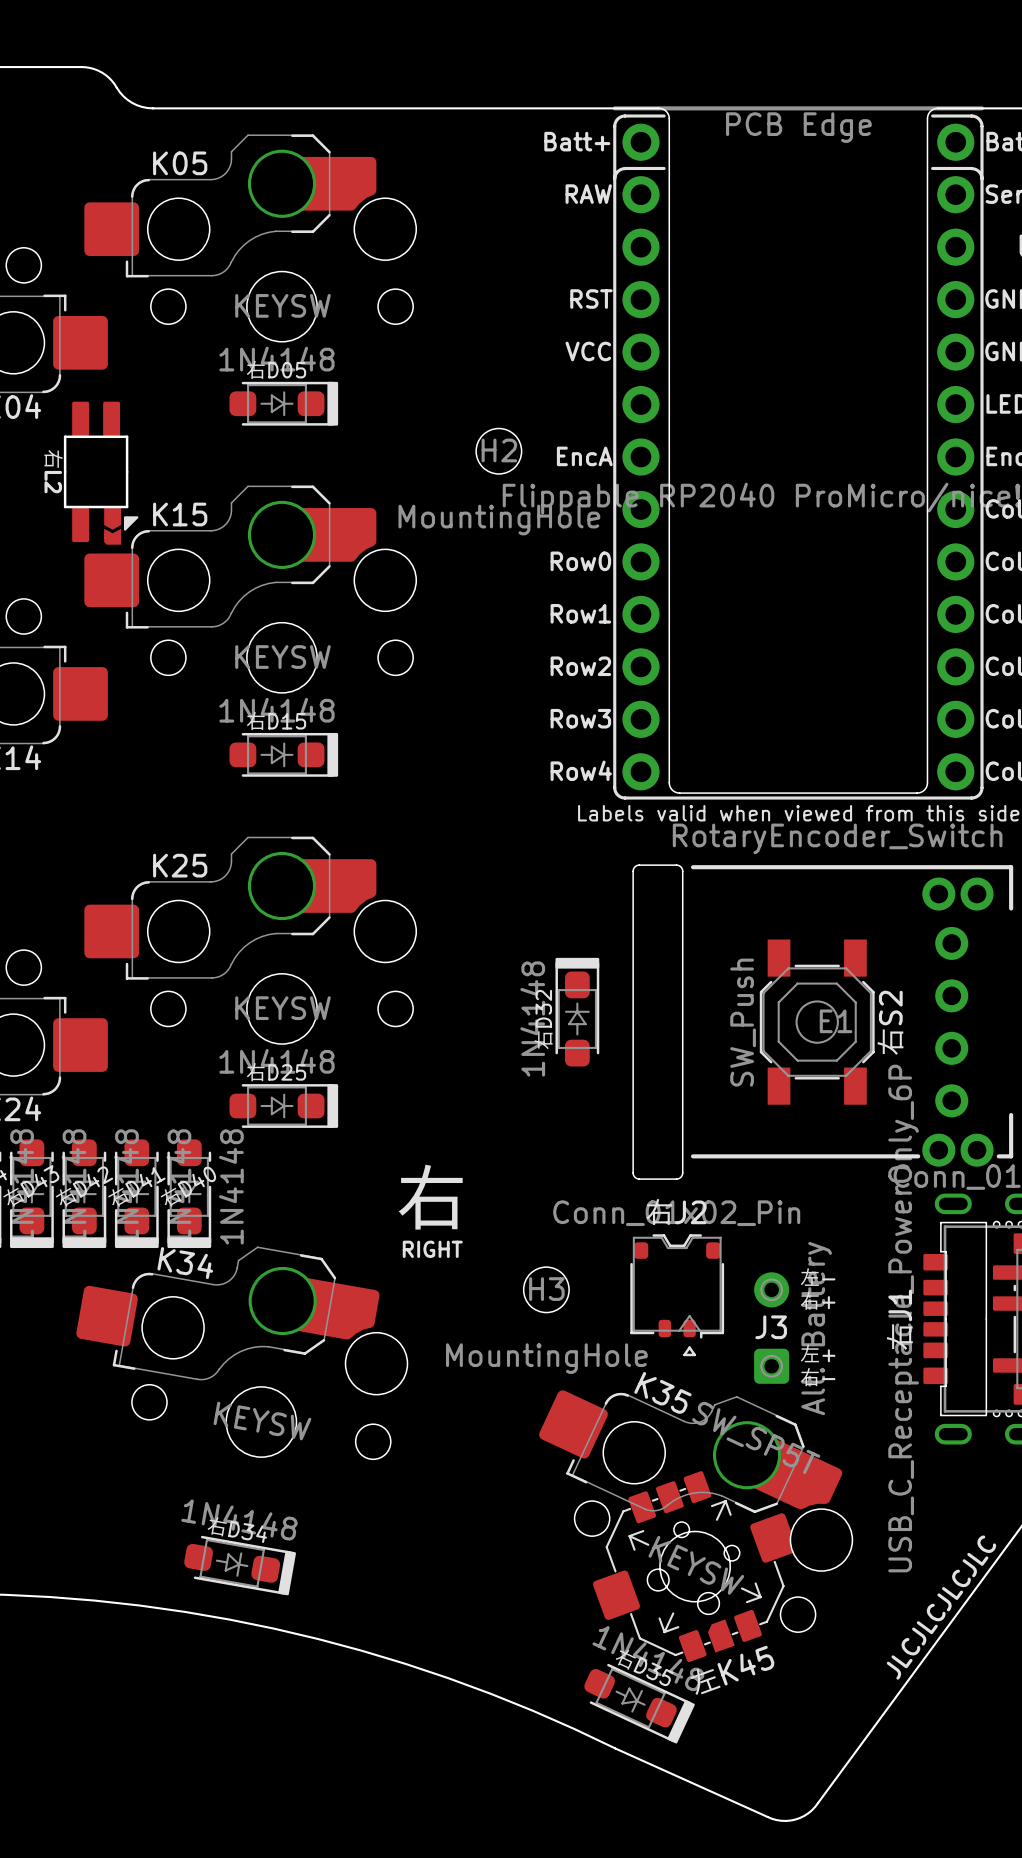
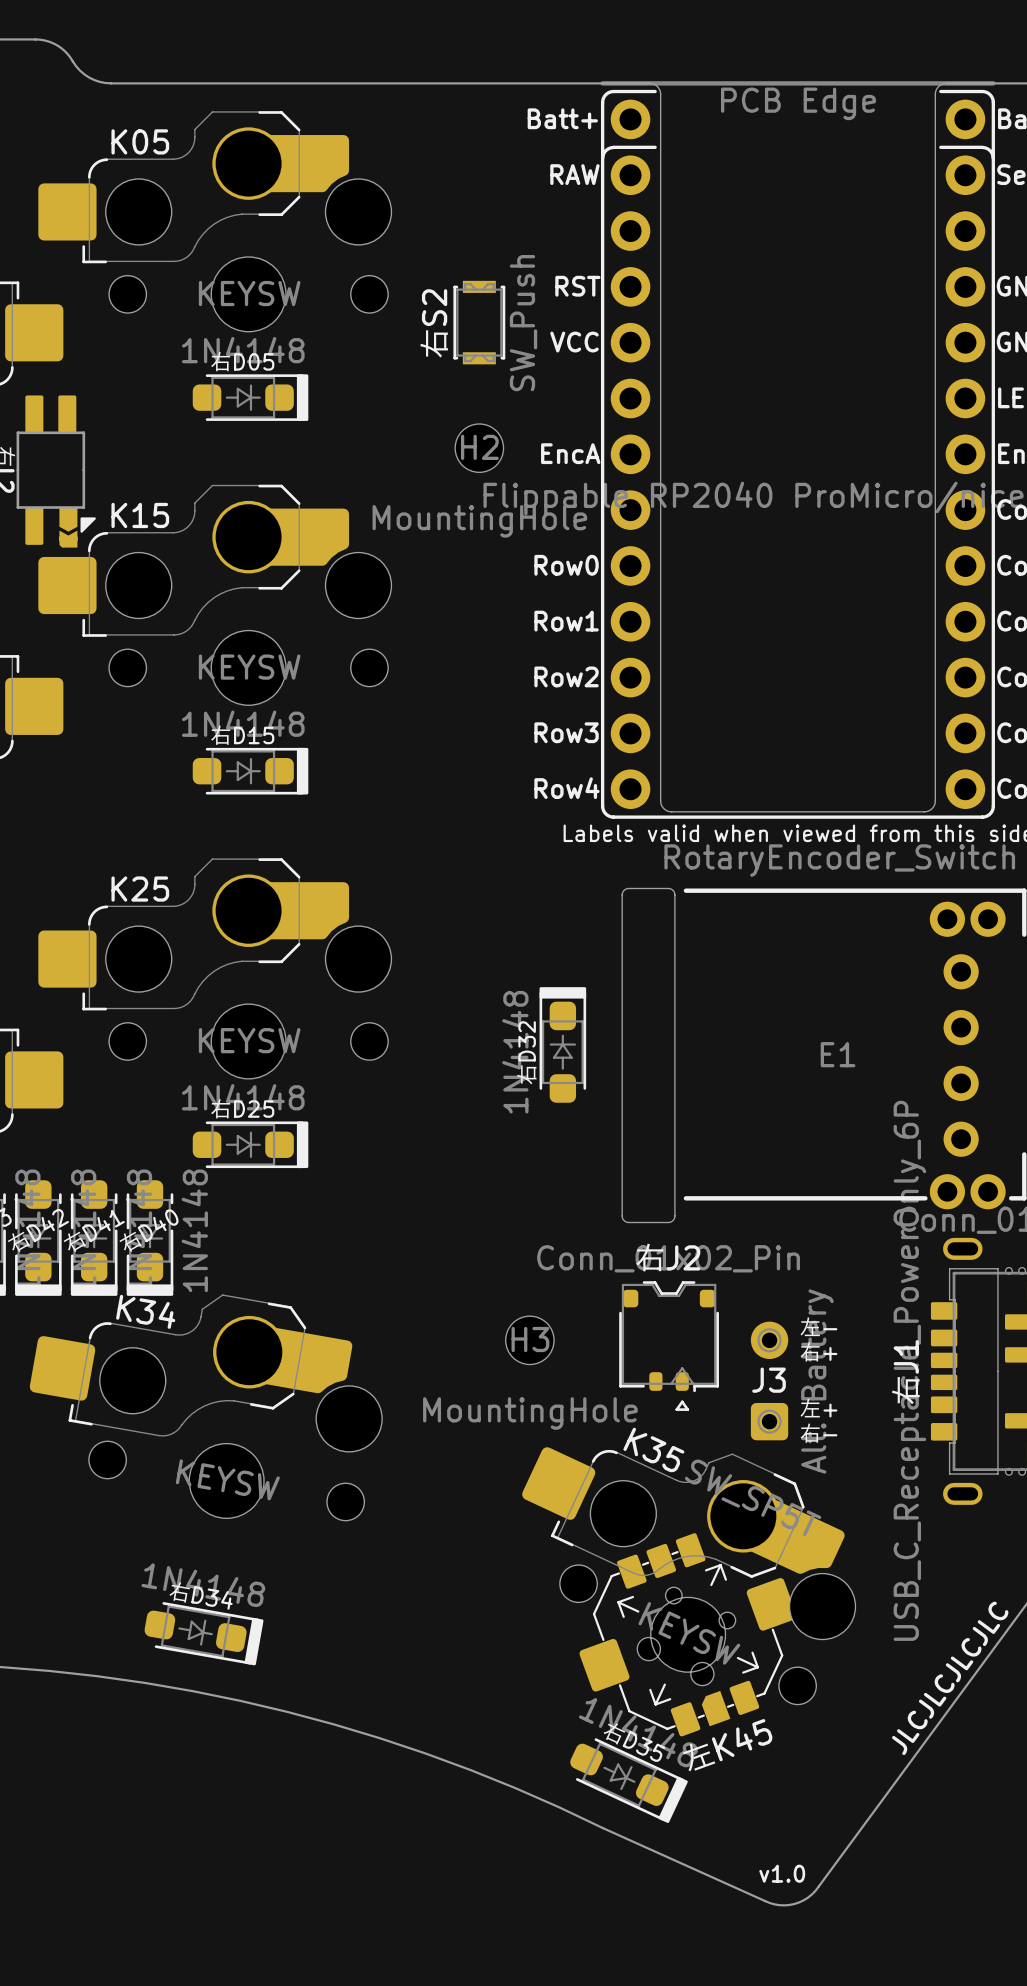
右S2 footprint: [759, 939, 875, 1105] -> [453, 280, 506, 365]
右S2 value position: SW_Push (743, 1022) -> SW_Push (523, 323)
右S2 name position: 右S2 (890, 1023) -> 右S2 (434, 324)
text: 右 (430, 1197) -> none
text: RIGHT (432, 1249) -> none
text: none -> v1.0 (782, 1873)

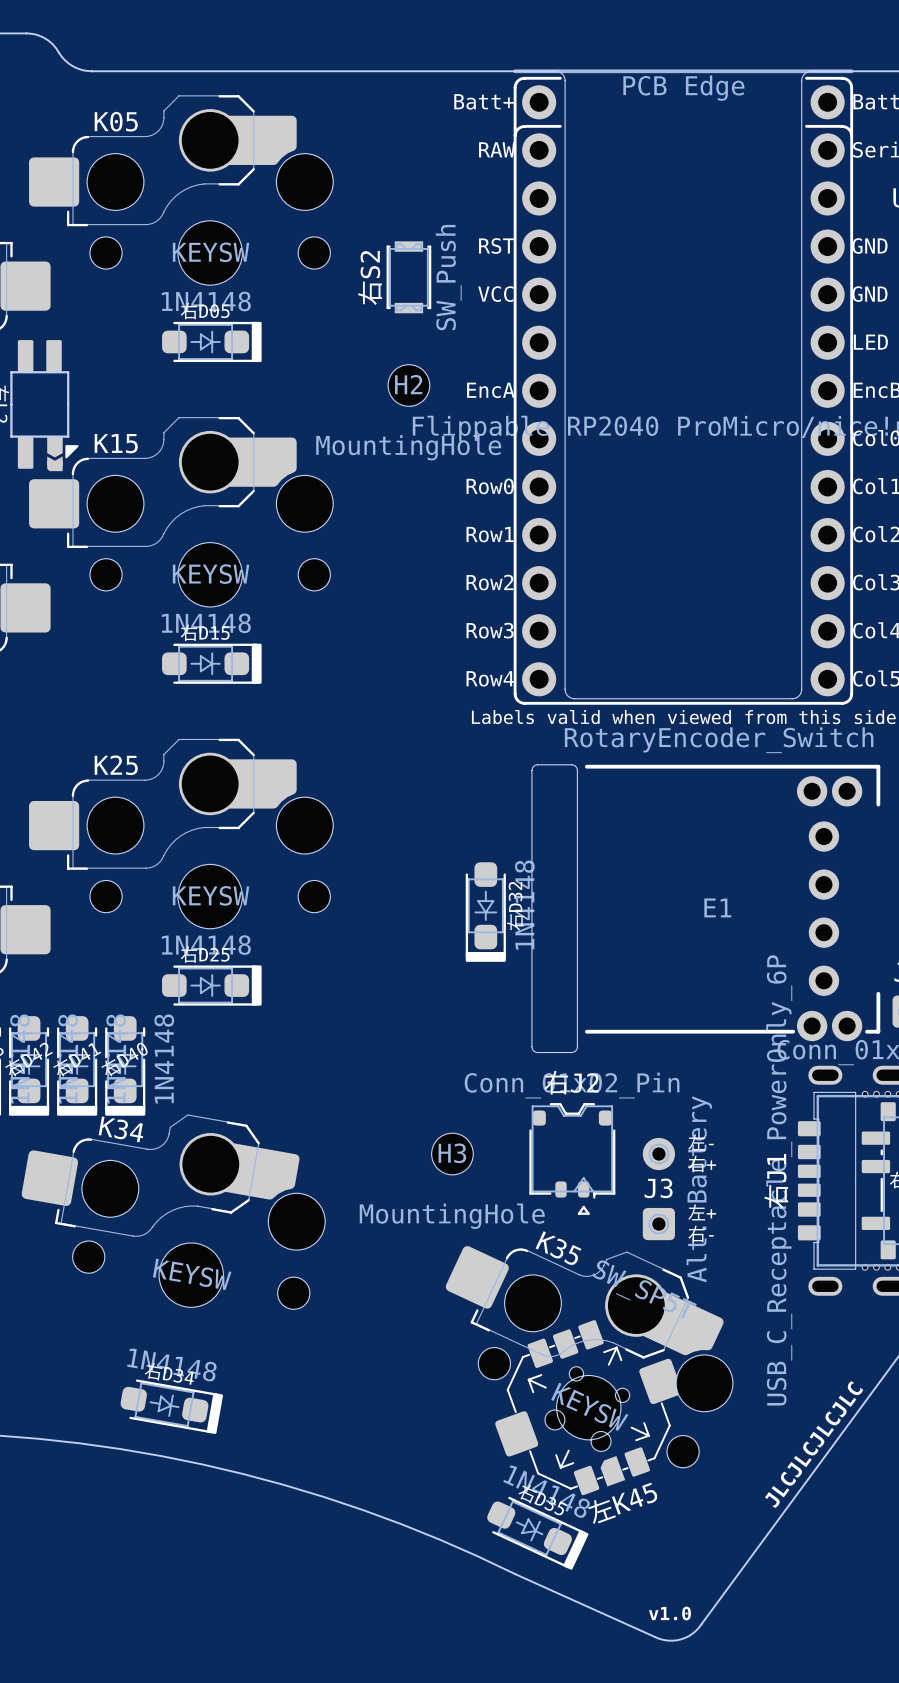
右D32 rotation: 0° (562, 1044) -> 180° (485, 912)

